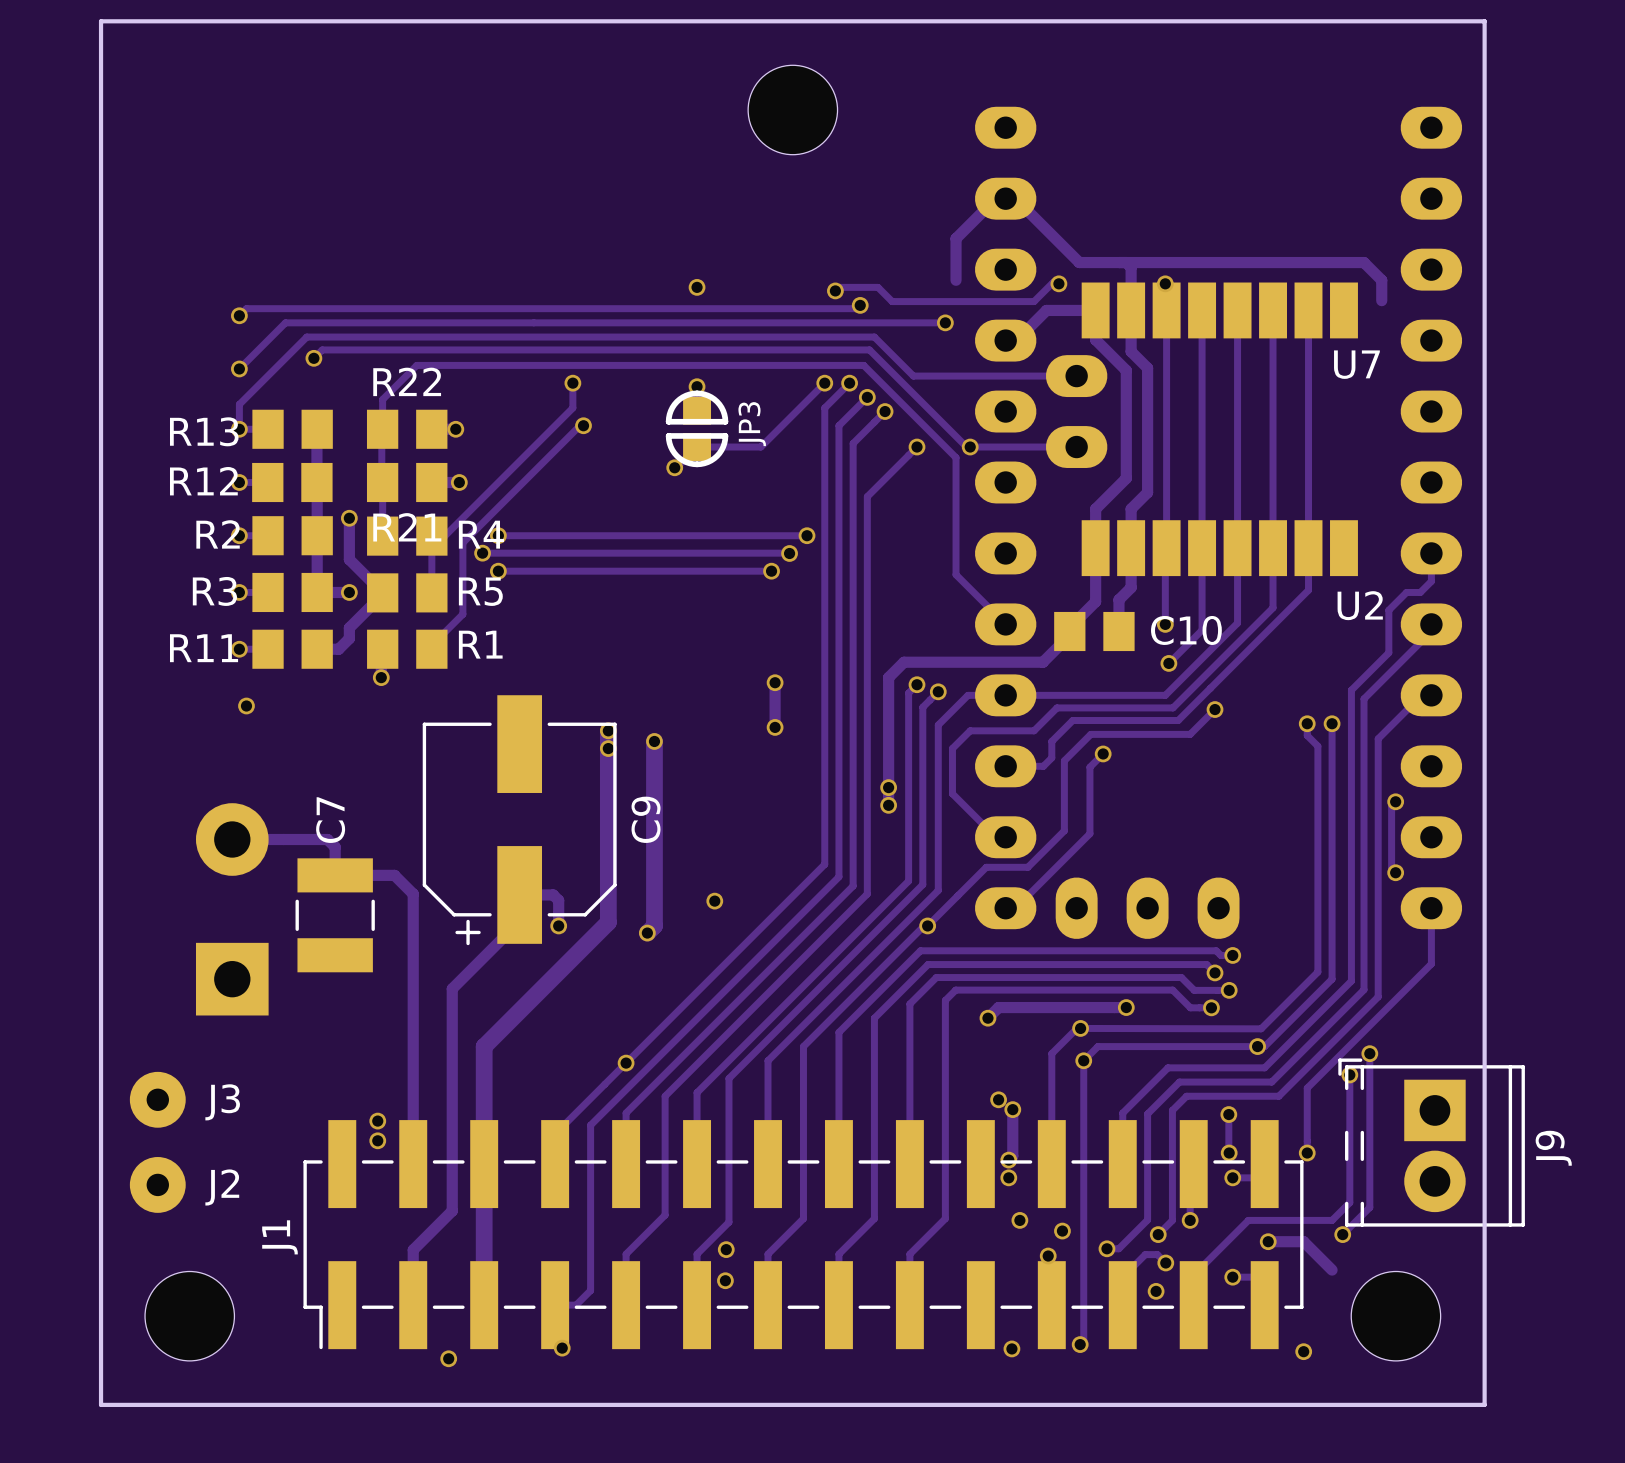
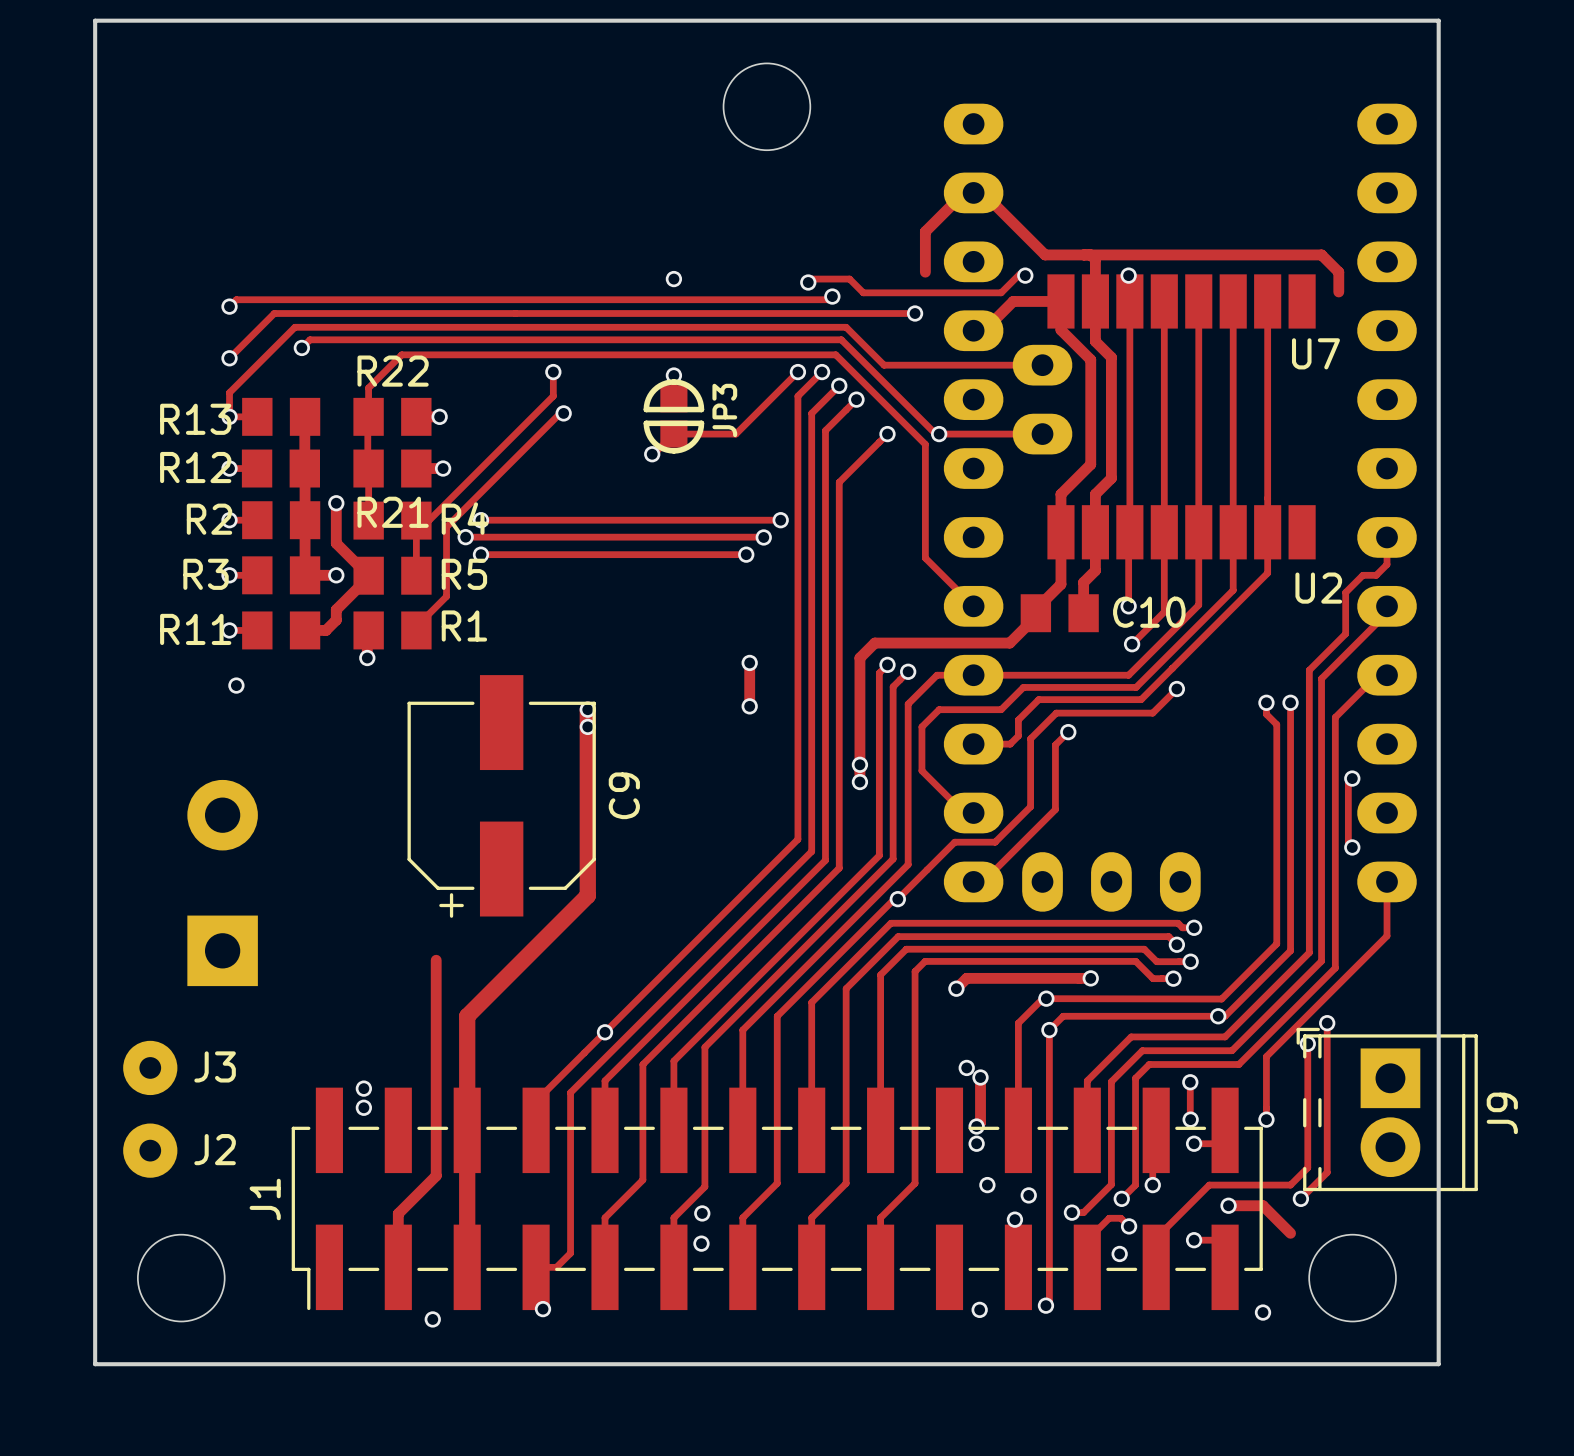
track: (654, 741) (654, 925) (647, 933) -> none
via: (654, 741) -> none
track: (232, 839) (327, 839) (335, 847) (335, 875) (394, 875) (413, 894) (413, 1164) -> none
track: (519, 894) (553, 894) (558, 900) (558, 925) -> none
via: (714, 901) -> none
C7: (335, 915) -> none
track: (519, 921) (452, 988) -> none
via: (558, 925) -> none
via: (647, 933) -> none

